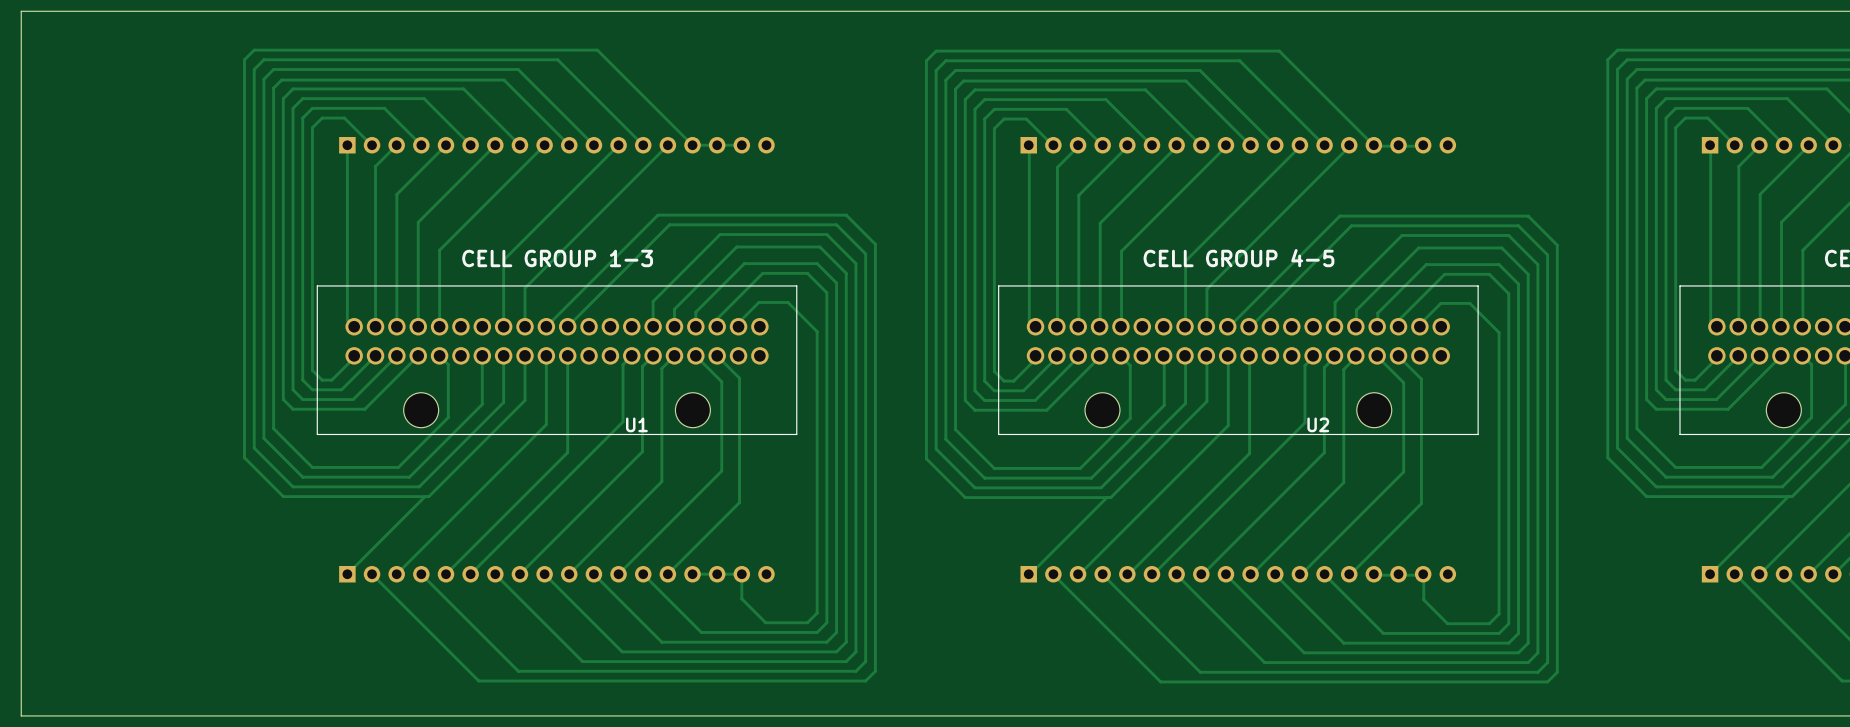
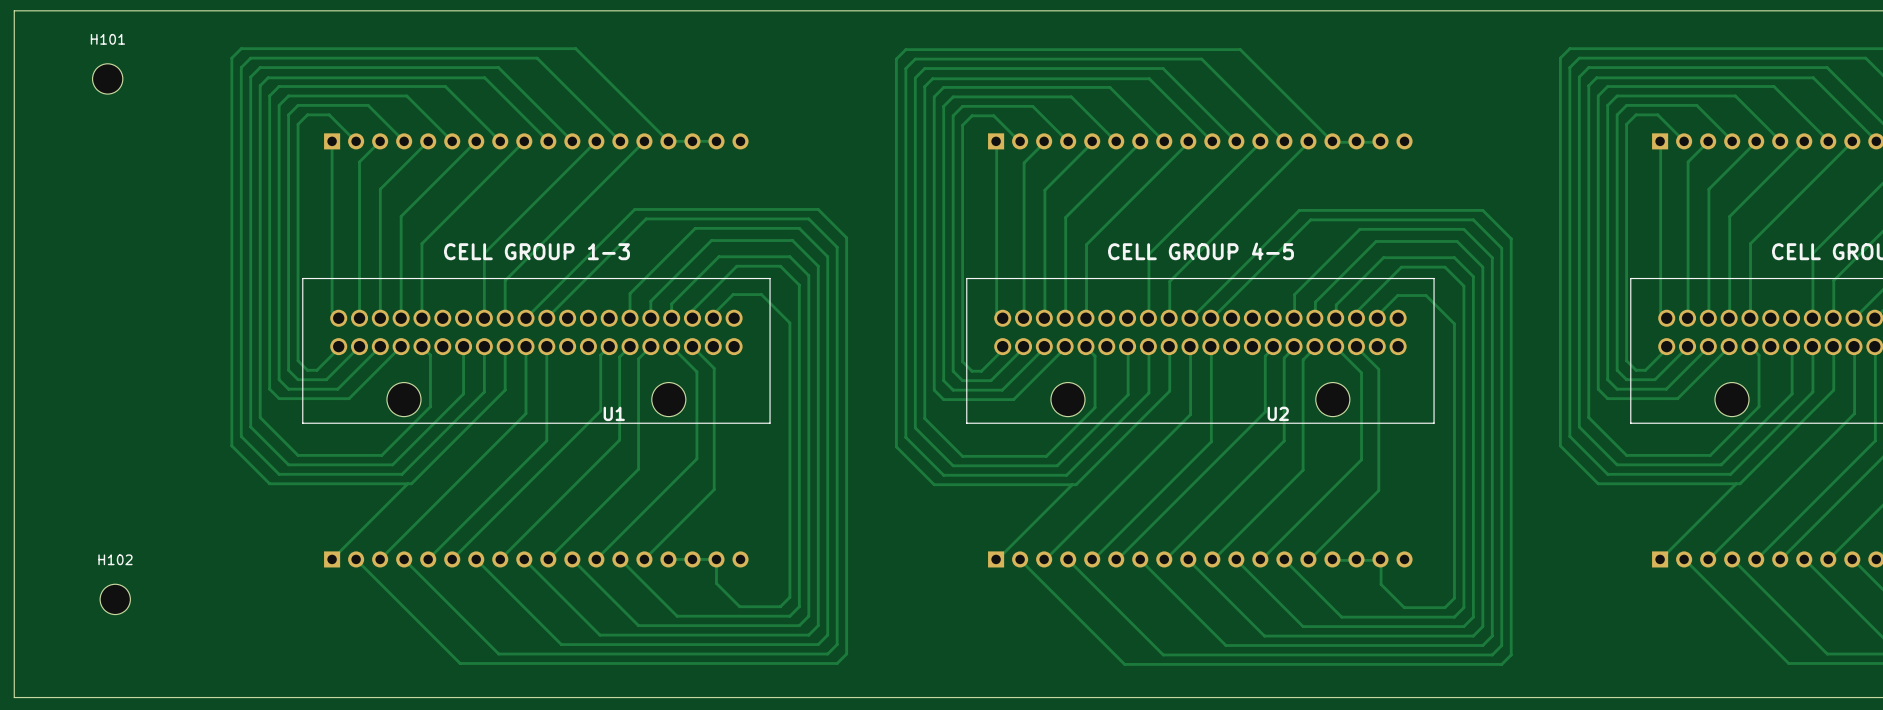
H101: none -> (107, 78)
H102: none -> (115, 599)

